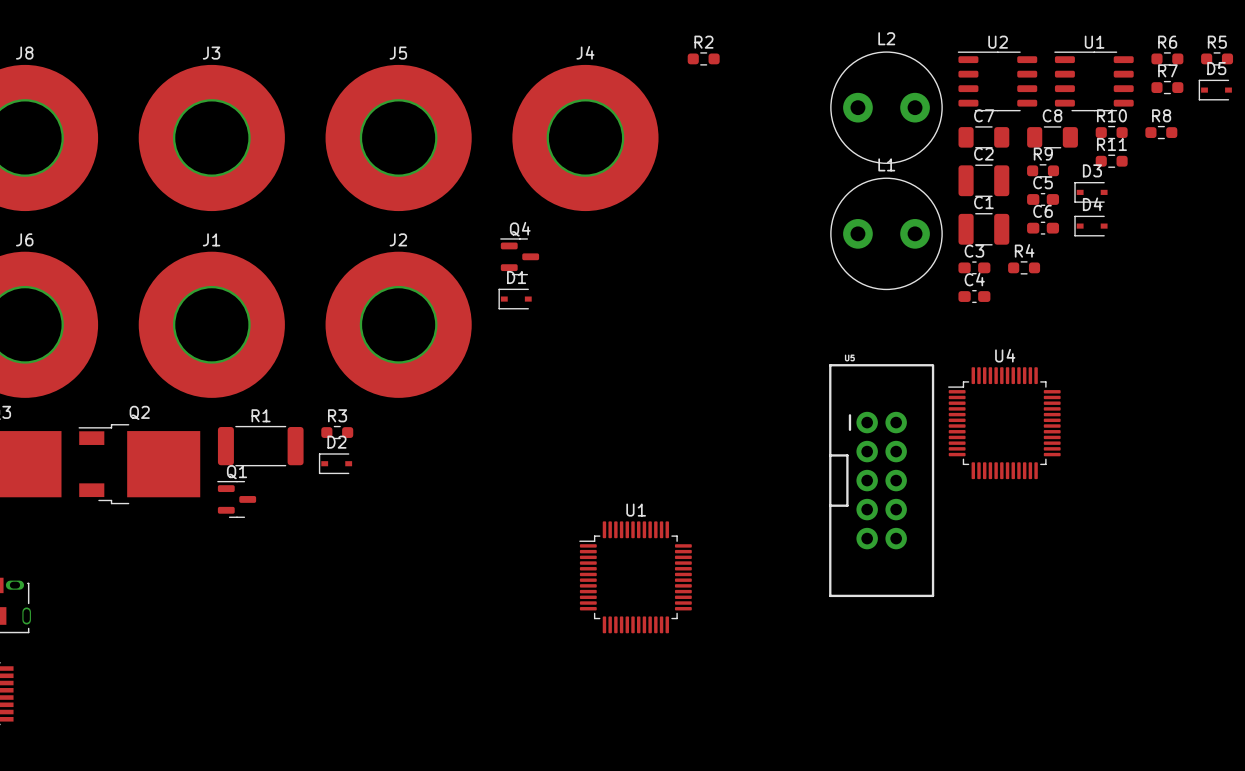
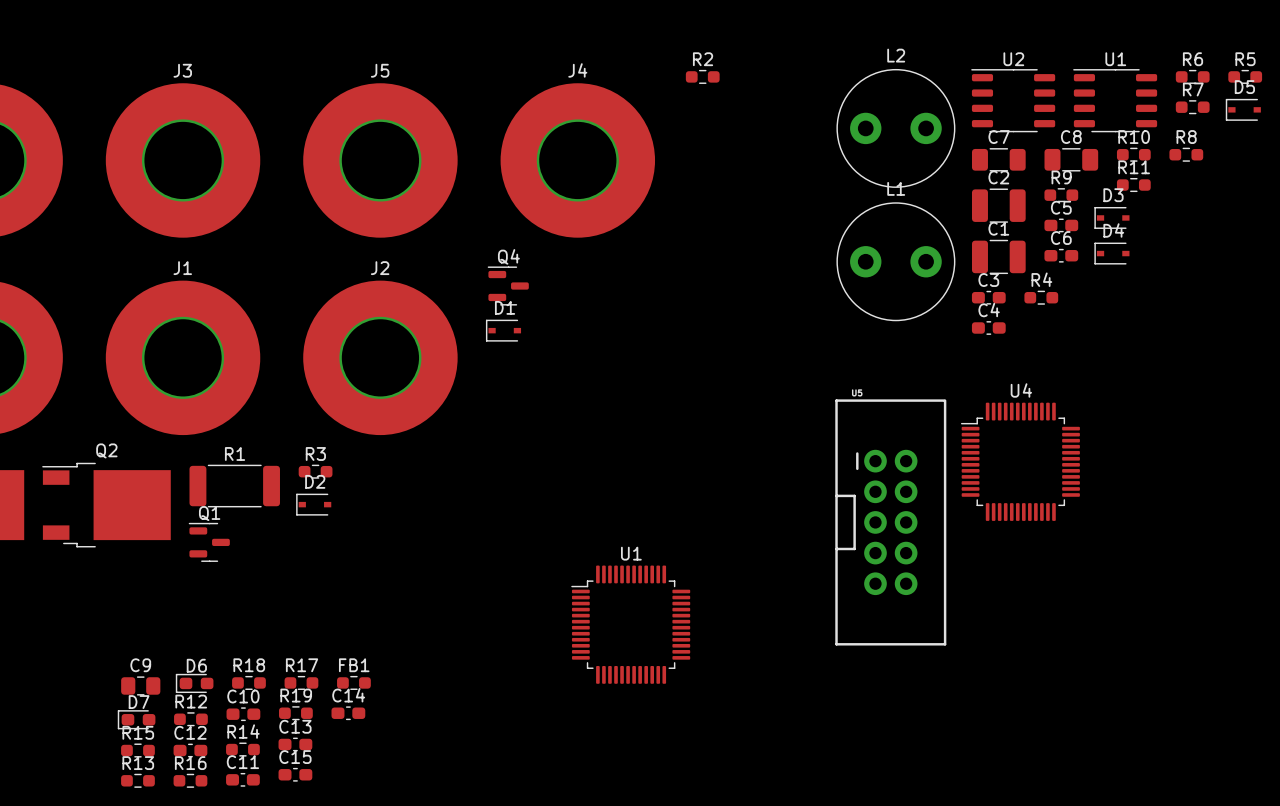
D6: none -> (194, 683)
R18: none -> (248, 682)
R17: none -> (301, 682)
FB1: none -> (353, 682)
C9: none -> (140, 685)
R19: none -> (295, 713)
C14: none -> (348, 713)
C10: none -> (243, 714)
R12: none -> (190, 719)
D7: none -> (136, 719)
C13: none -> (295, 744)
R14: none -> (242, 749)
R15: none -> (137, 750)
C12: none -> (190, 750)
C15: none -> (295, 774)
C11: none -> (242, 779)
R13: none -> (137, 780)
R16: none -> (190, 780)

